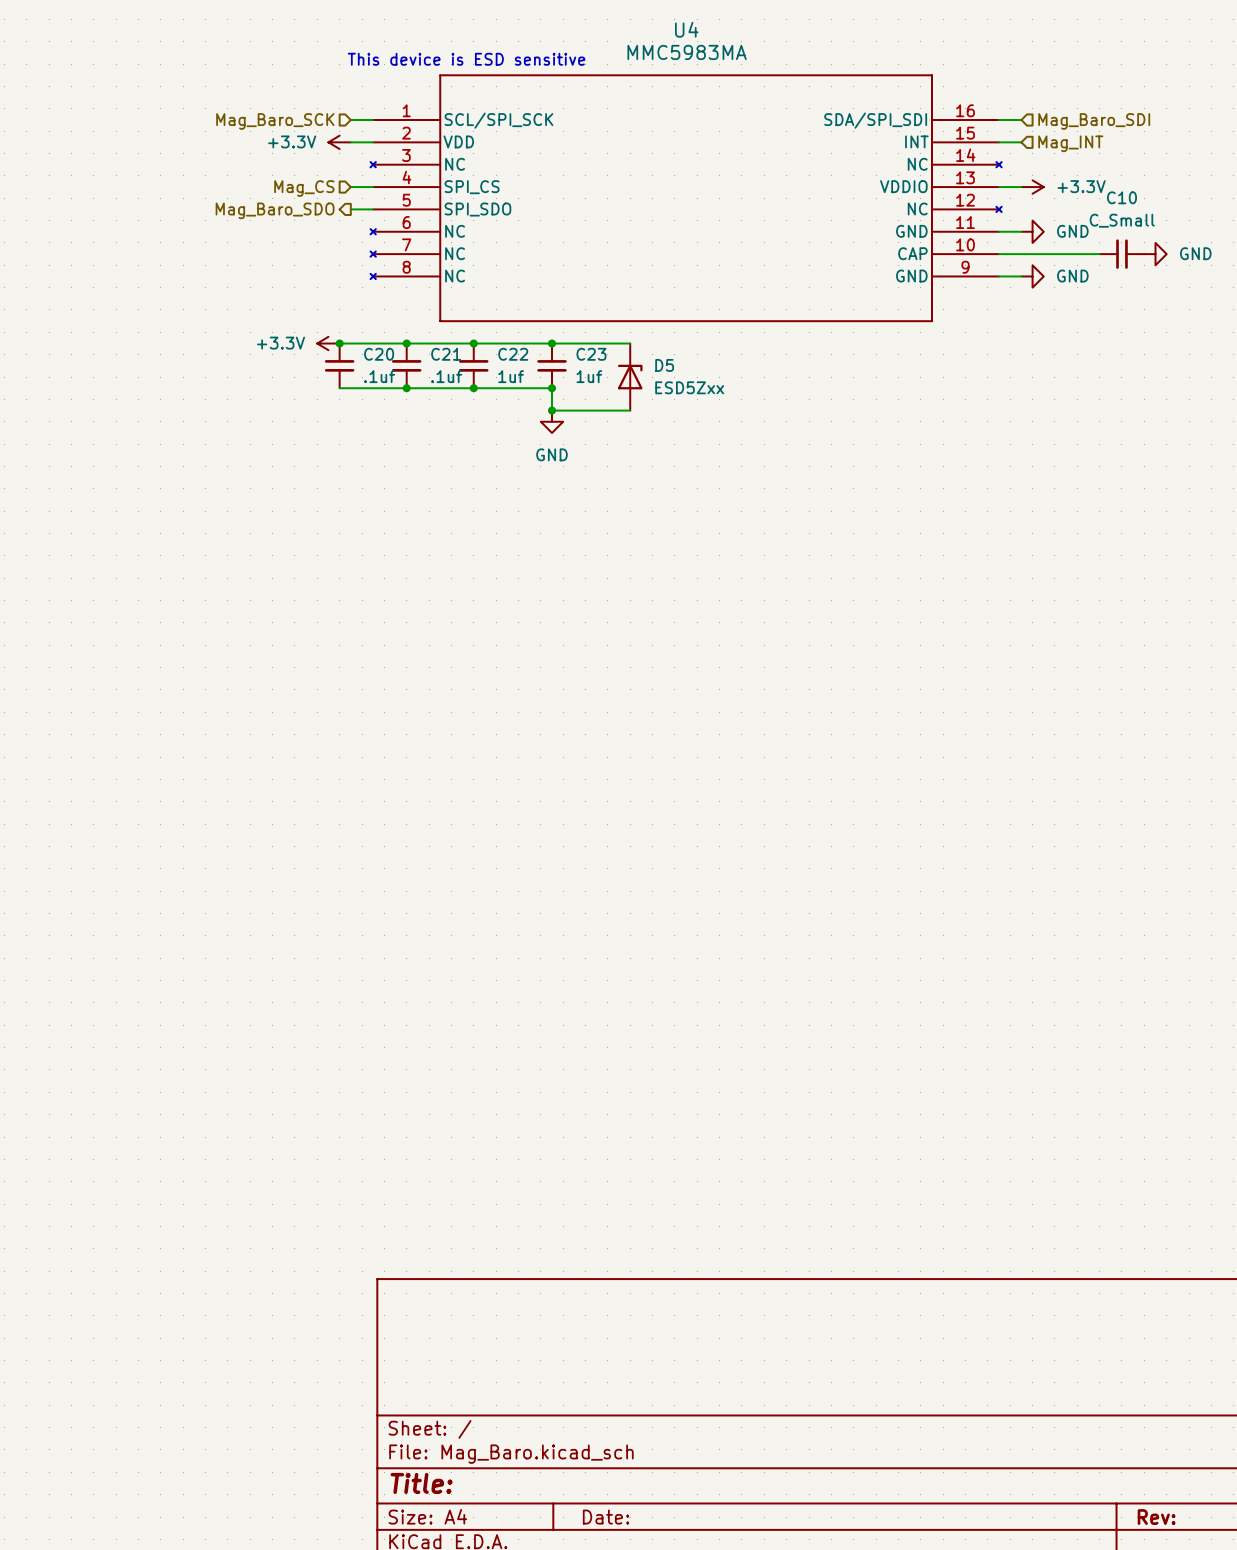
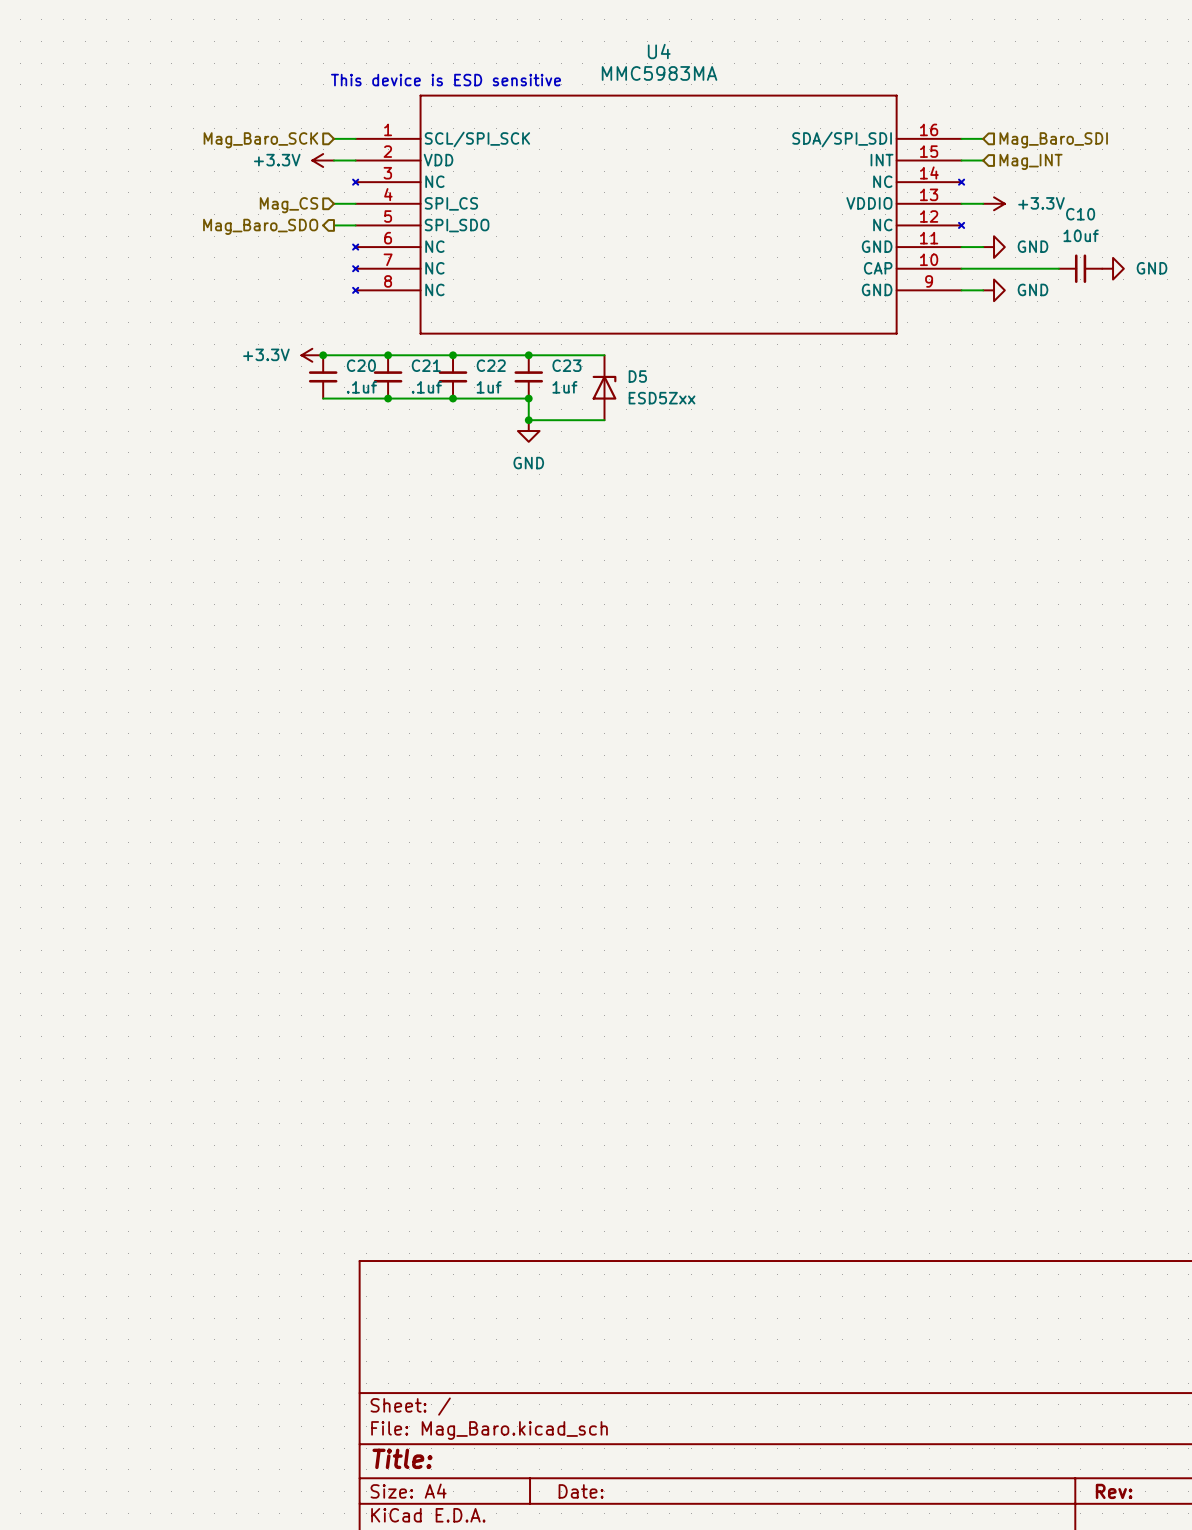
C10 value: C_Small (1122, 220) -> 10uf (1081, 235)

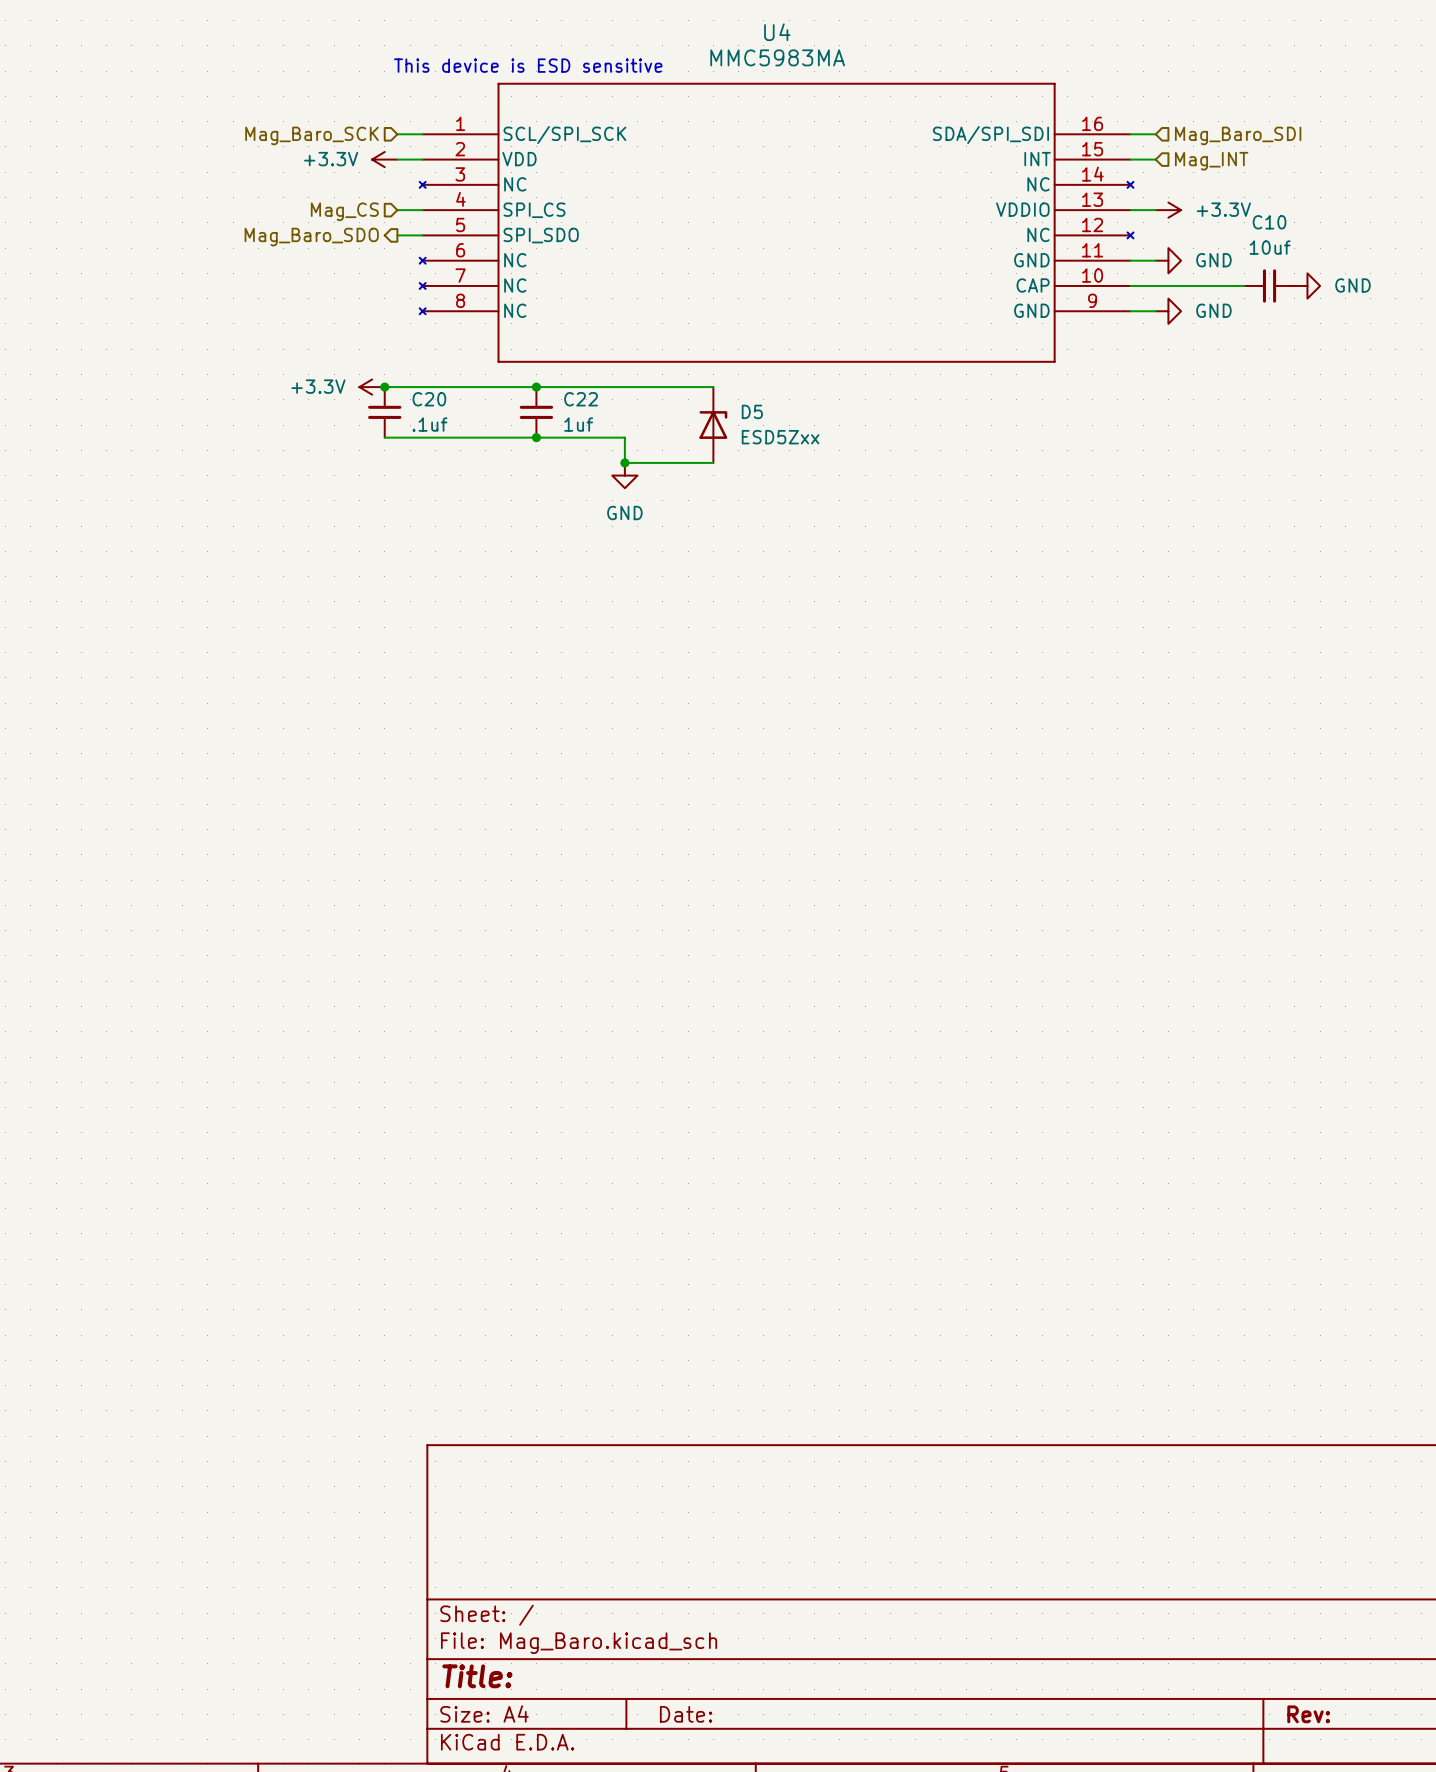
junction: (388, 355) -> none
junction: (528, 355) -> none
C21: .1uf (388, 376) -> none
C23: 1uf (528, 376) -> none
junction: (388, 398) -> none
junction: (528, 398) -> none

